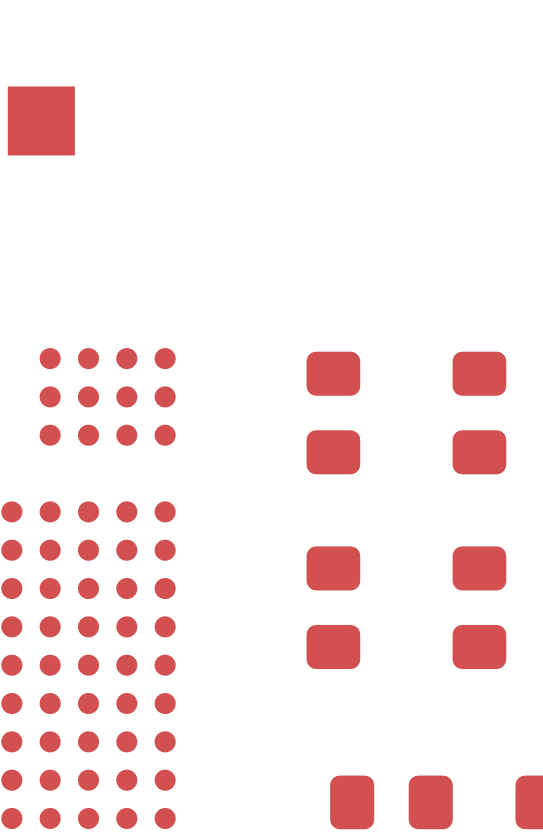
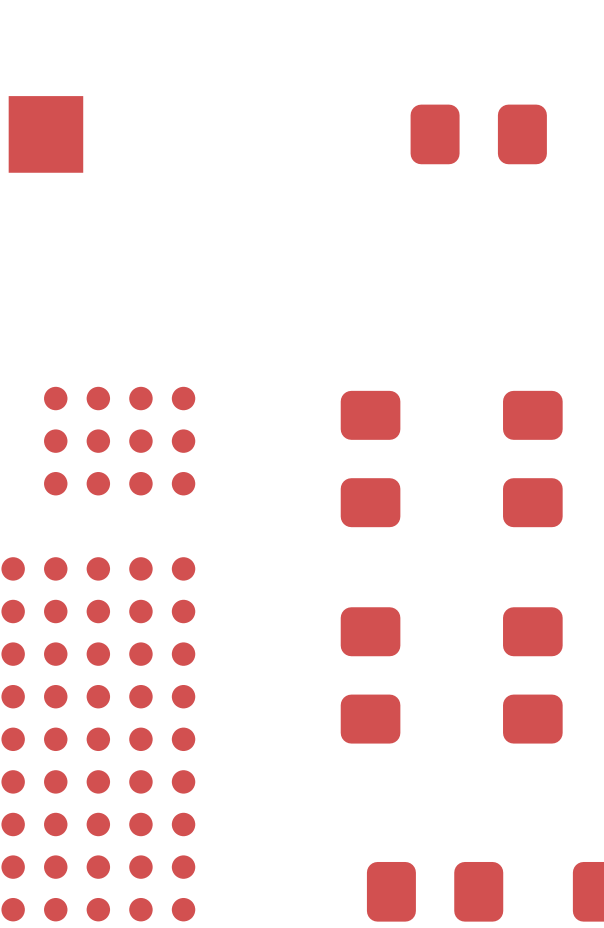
part: none -> (478, 134)

